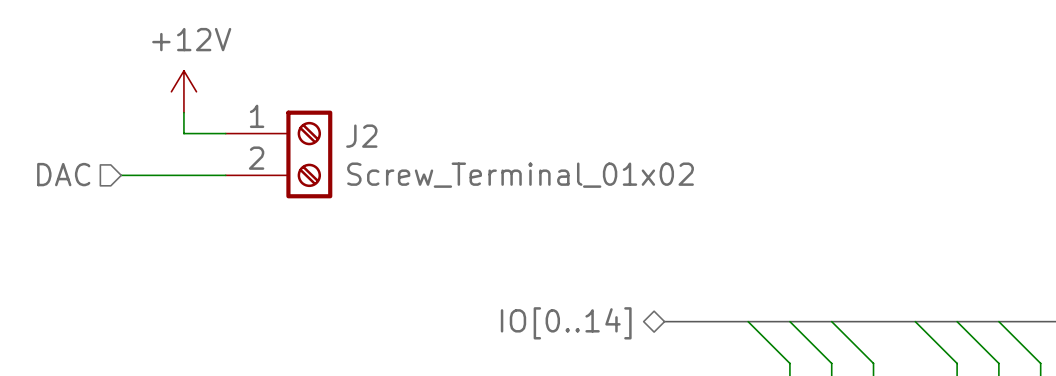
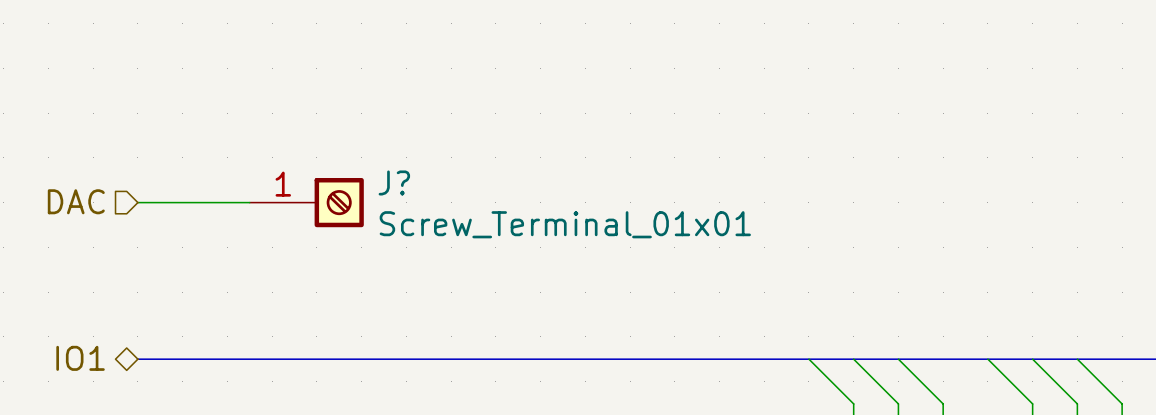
power symbol: +12V (183, 91) -> none
wire: (183, 112) (183, 133) (225, 133) -> none
J2: Screw_Terminal_01x02 (279, 154) -> none
J?: none -> Screw_Terminal_01x01 (306, 202)
hierarchical label: none -> IO1 (80, 358)
bus: none -> (137, 359) (719, 359)
hierarchical label: IO[0..14] (566, 323) -> none

